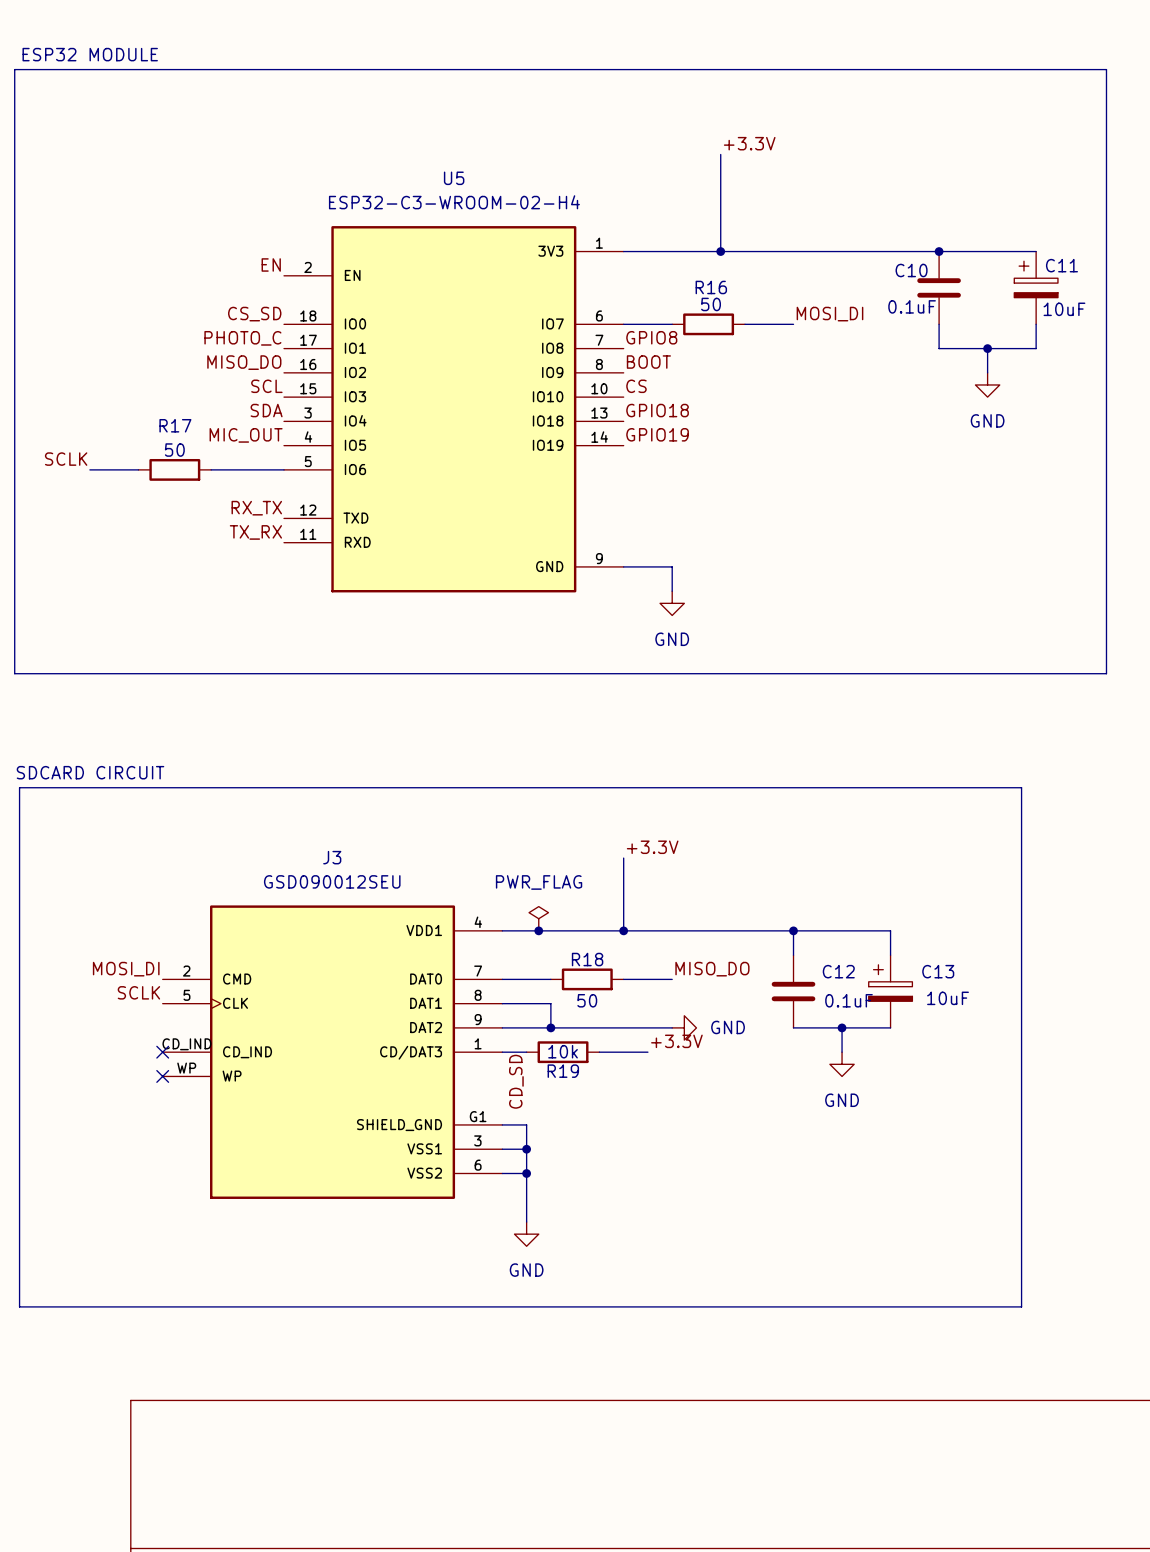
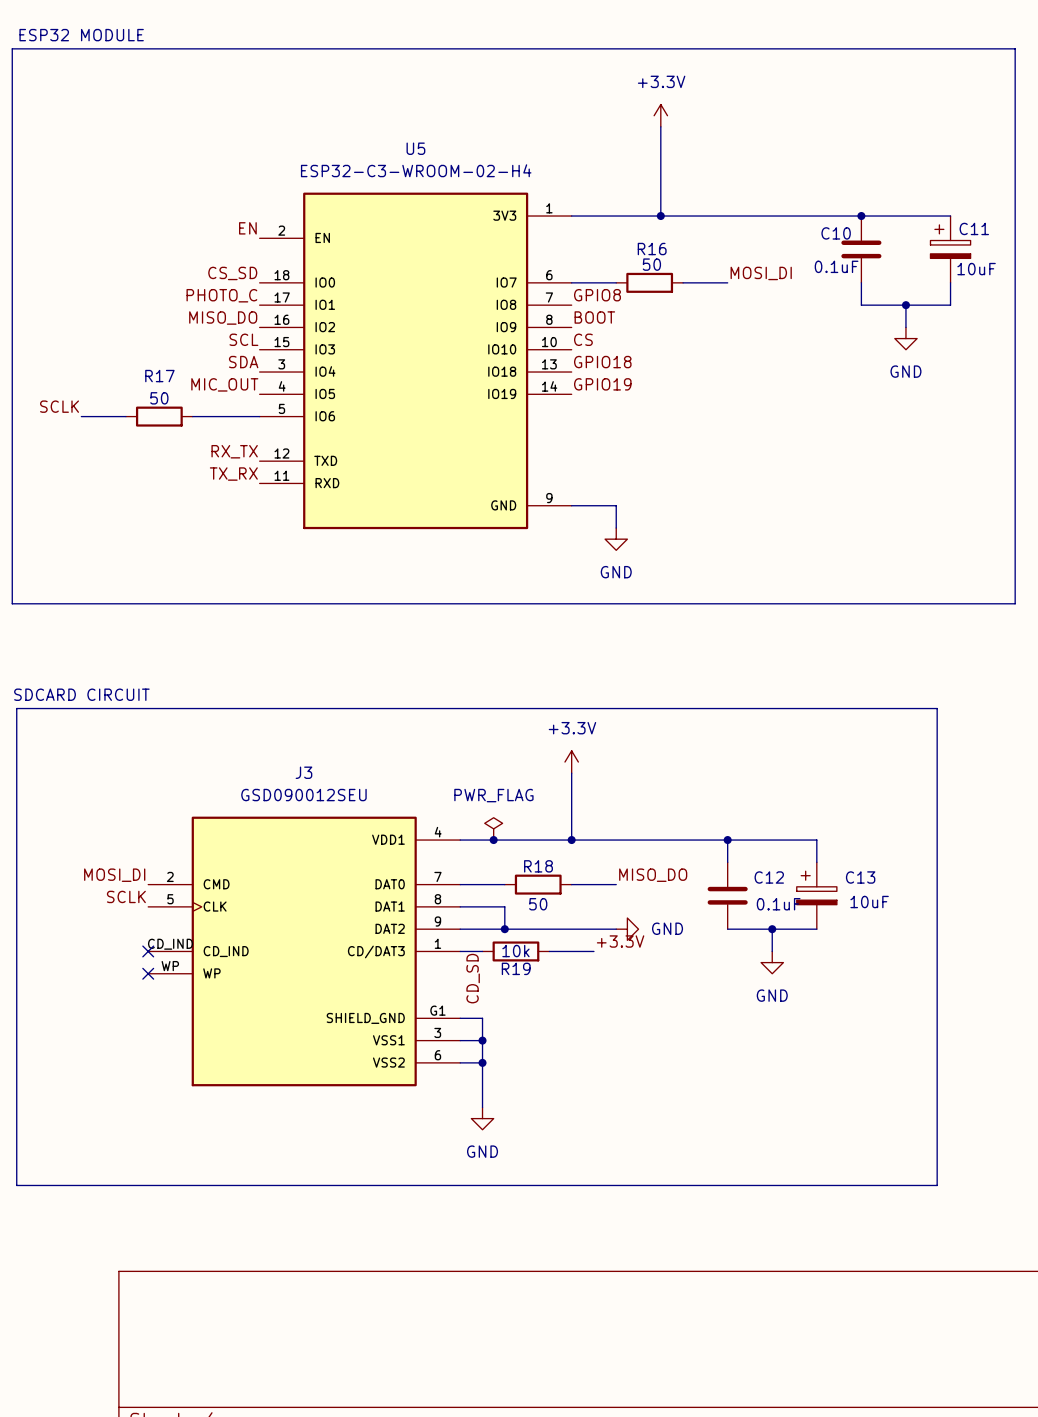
power symbol: none -> +3.3V (660, 115)
label: +3.3V (749, 143) -> none
power symbol: none -> +3.3V (571, 762)
label: +3.3V (652, 847) -> none

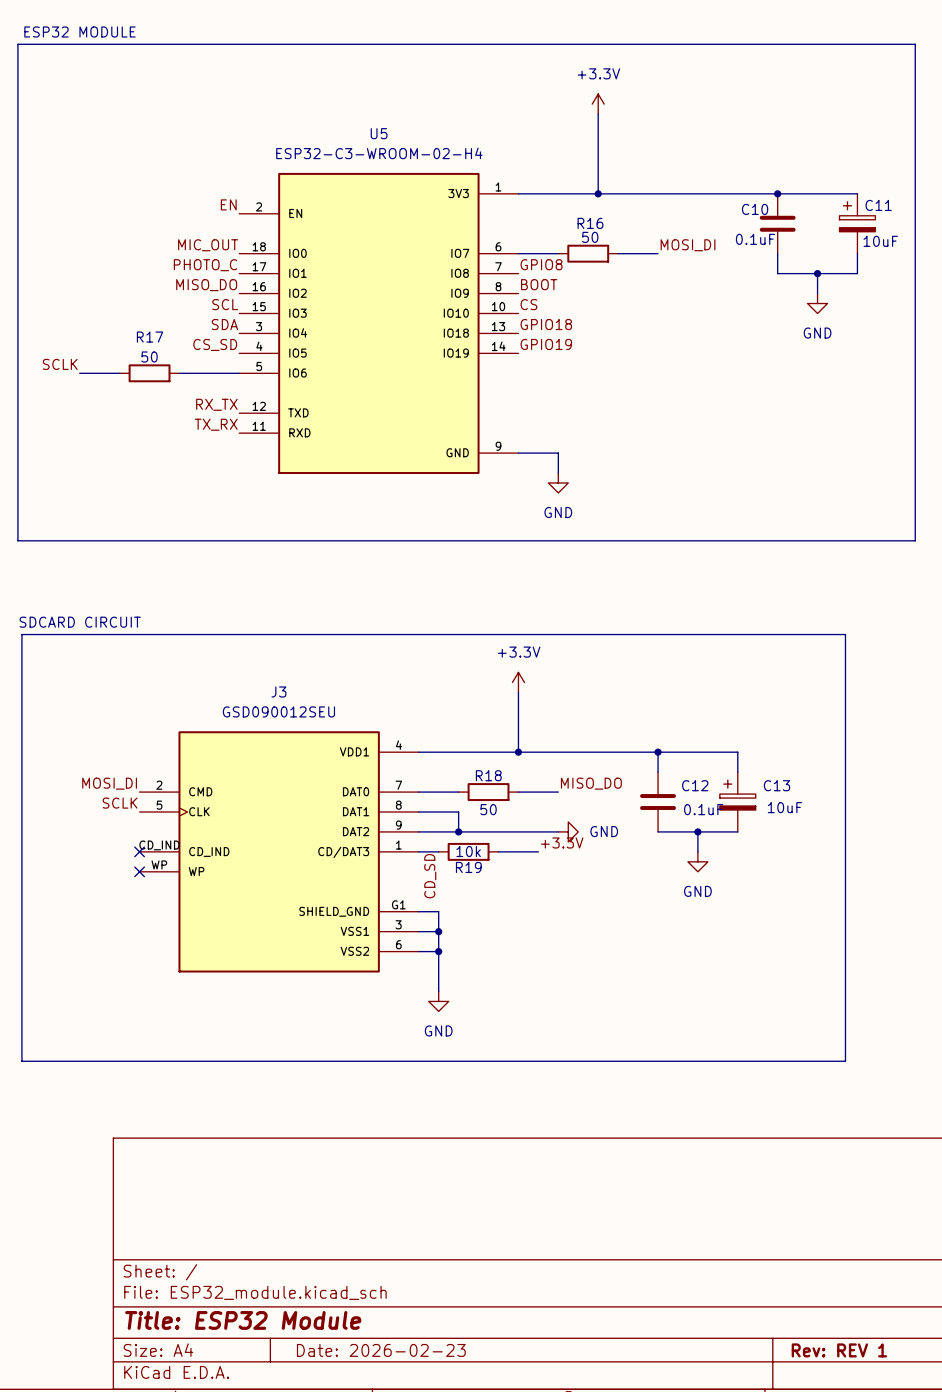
label: CS_SD (232, 273) -> MIC_OUT (208, 245)
label: MIC_OUT (224, 384) -> CS_SD (215, 344)
power symbol: PWR_FLAG (493, 828) -> none
junction: (493, 840) -> none

